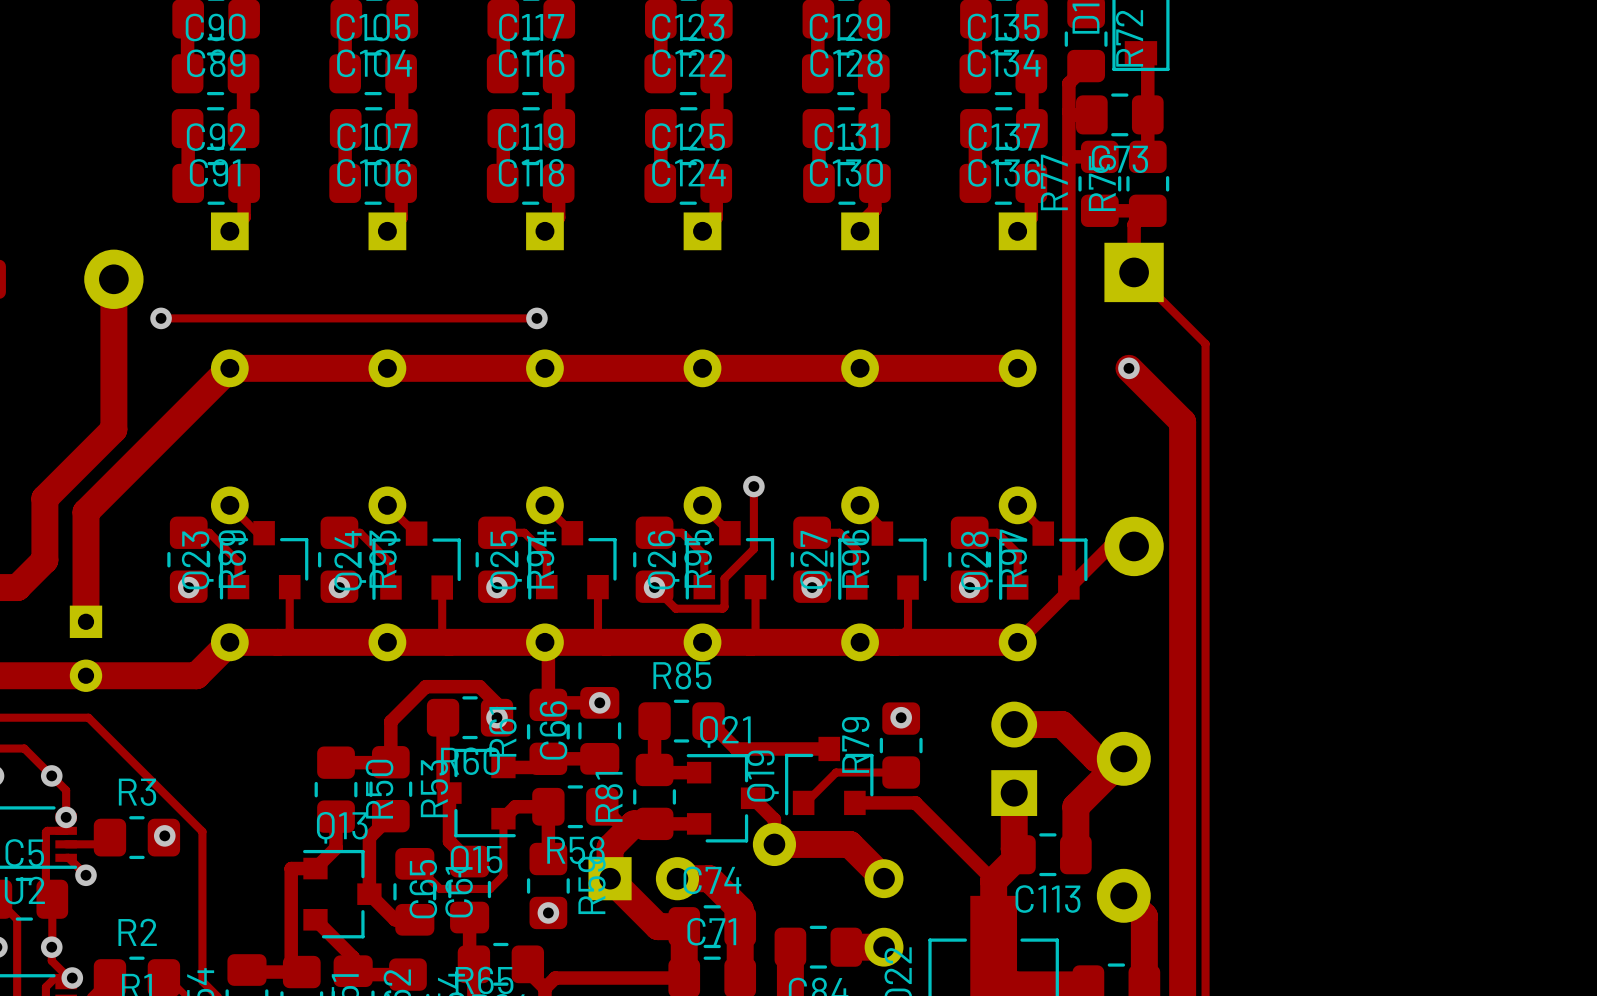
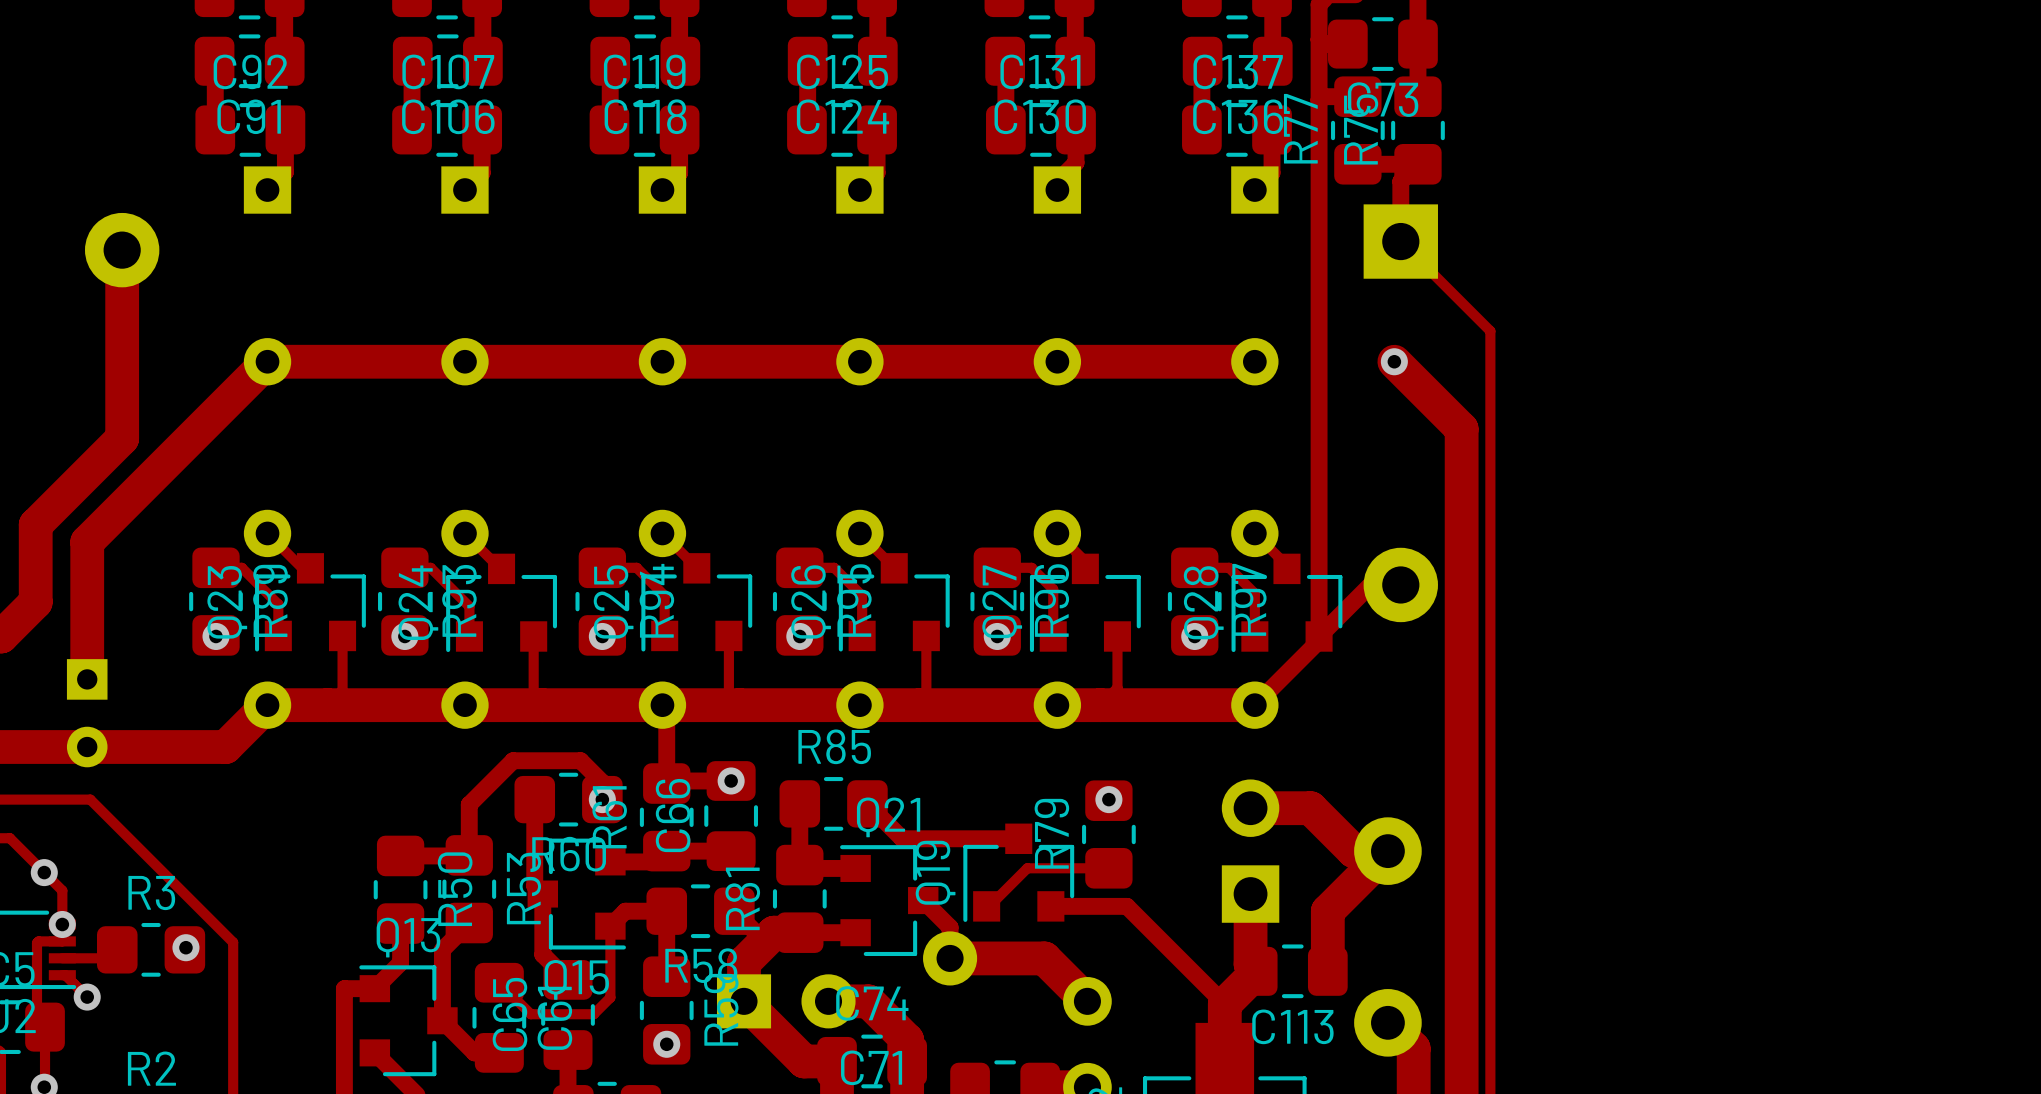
track: (161, 318) (536, 318) -> none
via: (161, 318) -> none
via: (536, 318) -> none
track: (753, 486) (753, 549) (724, 578) (724, 606) (722, 608) (675, 608) (654, 587) -> none
via: (753, 486) -> none

